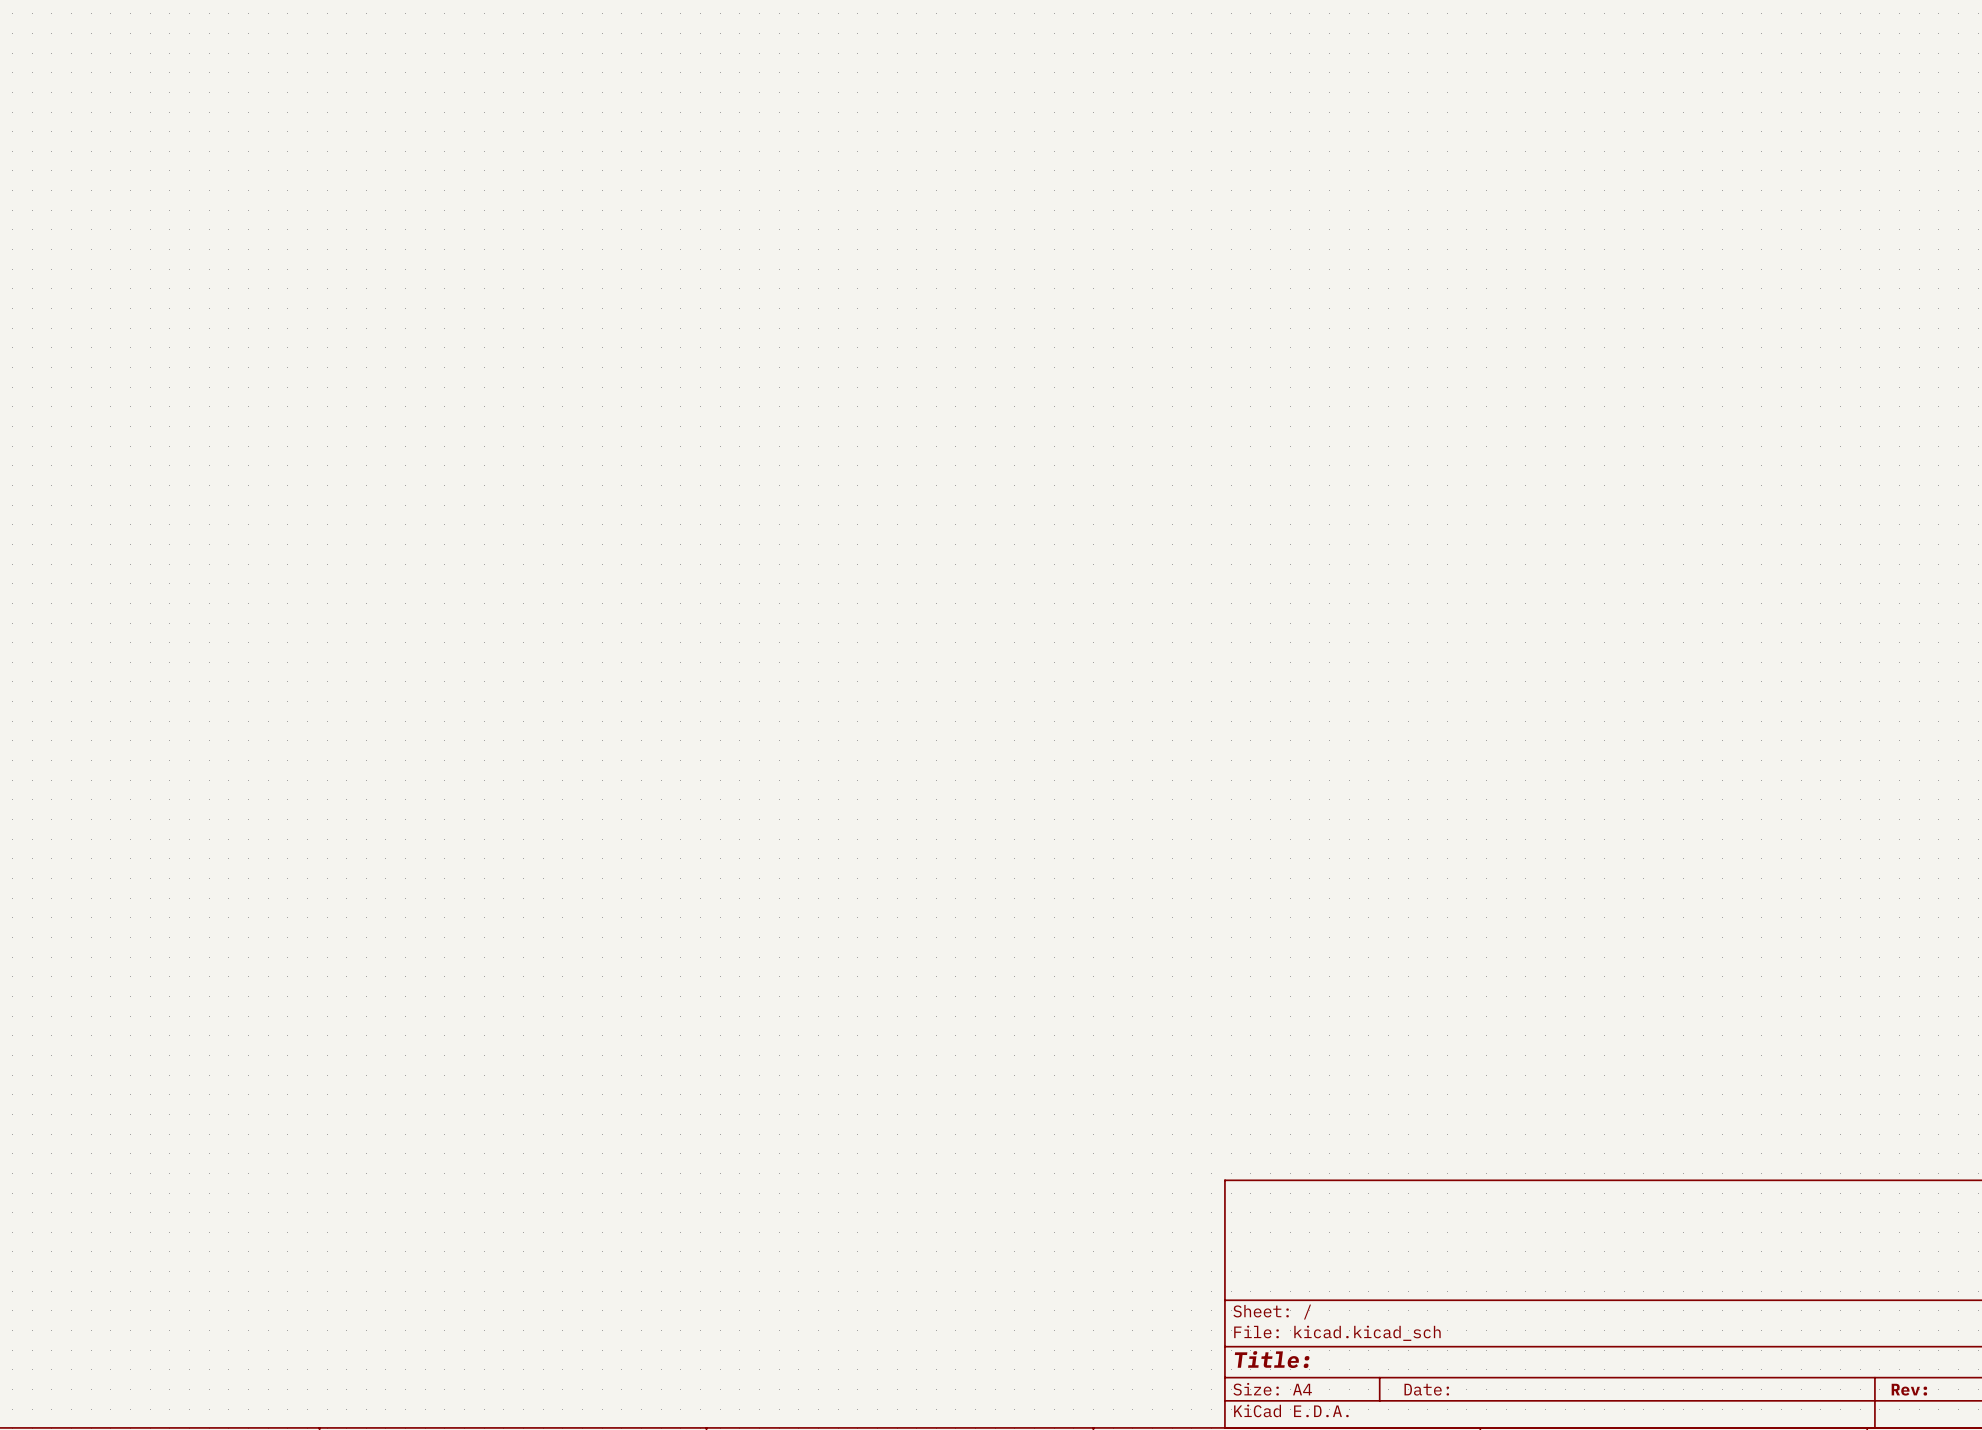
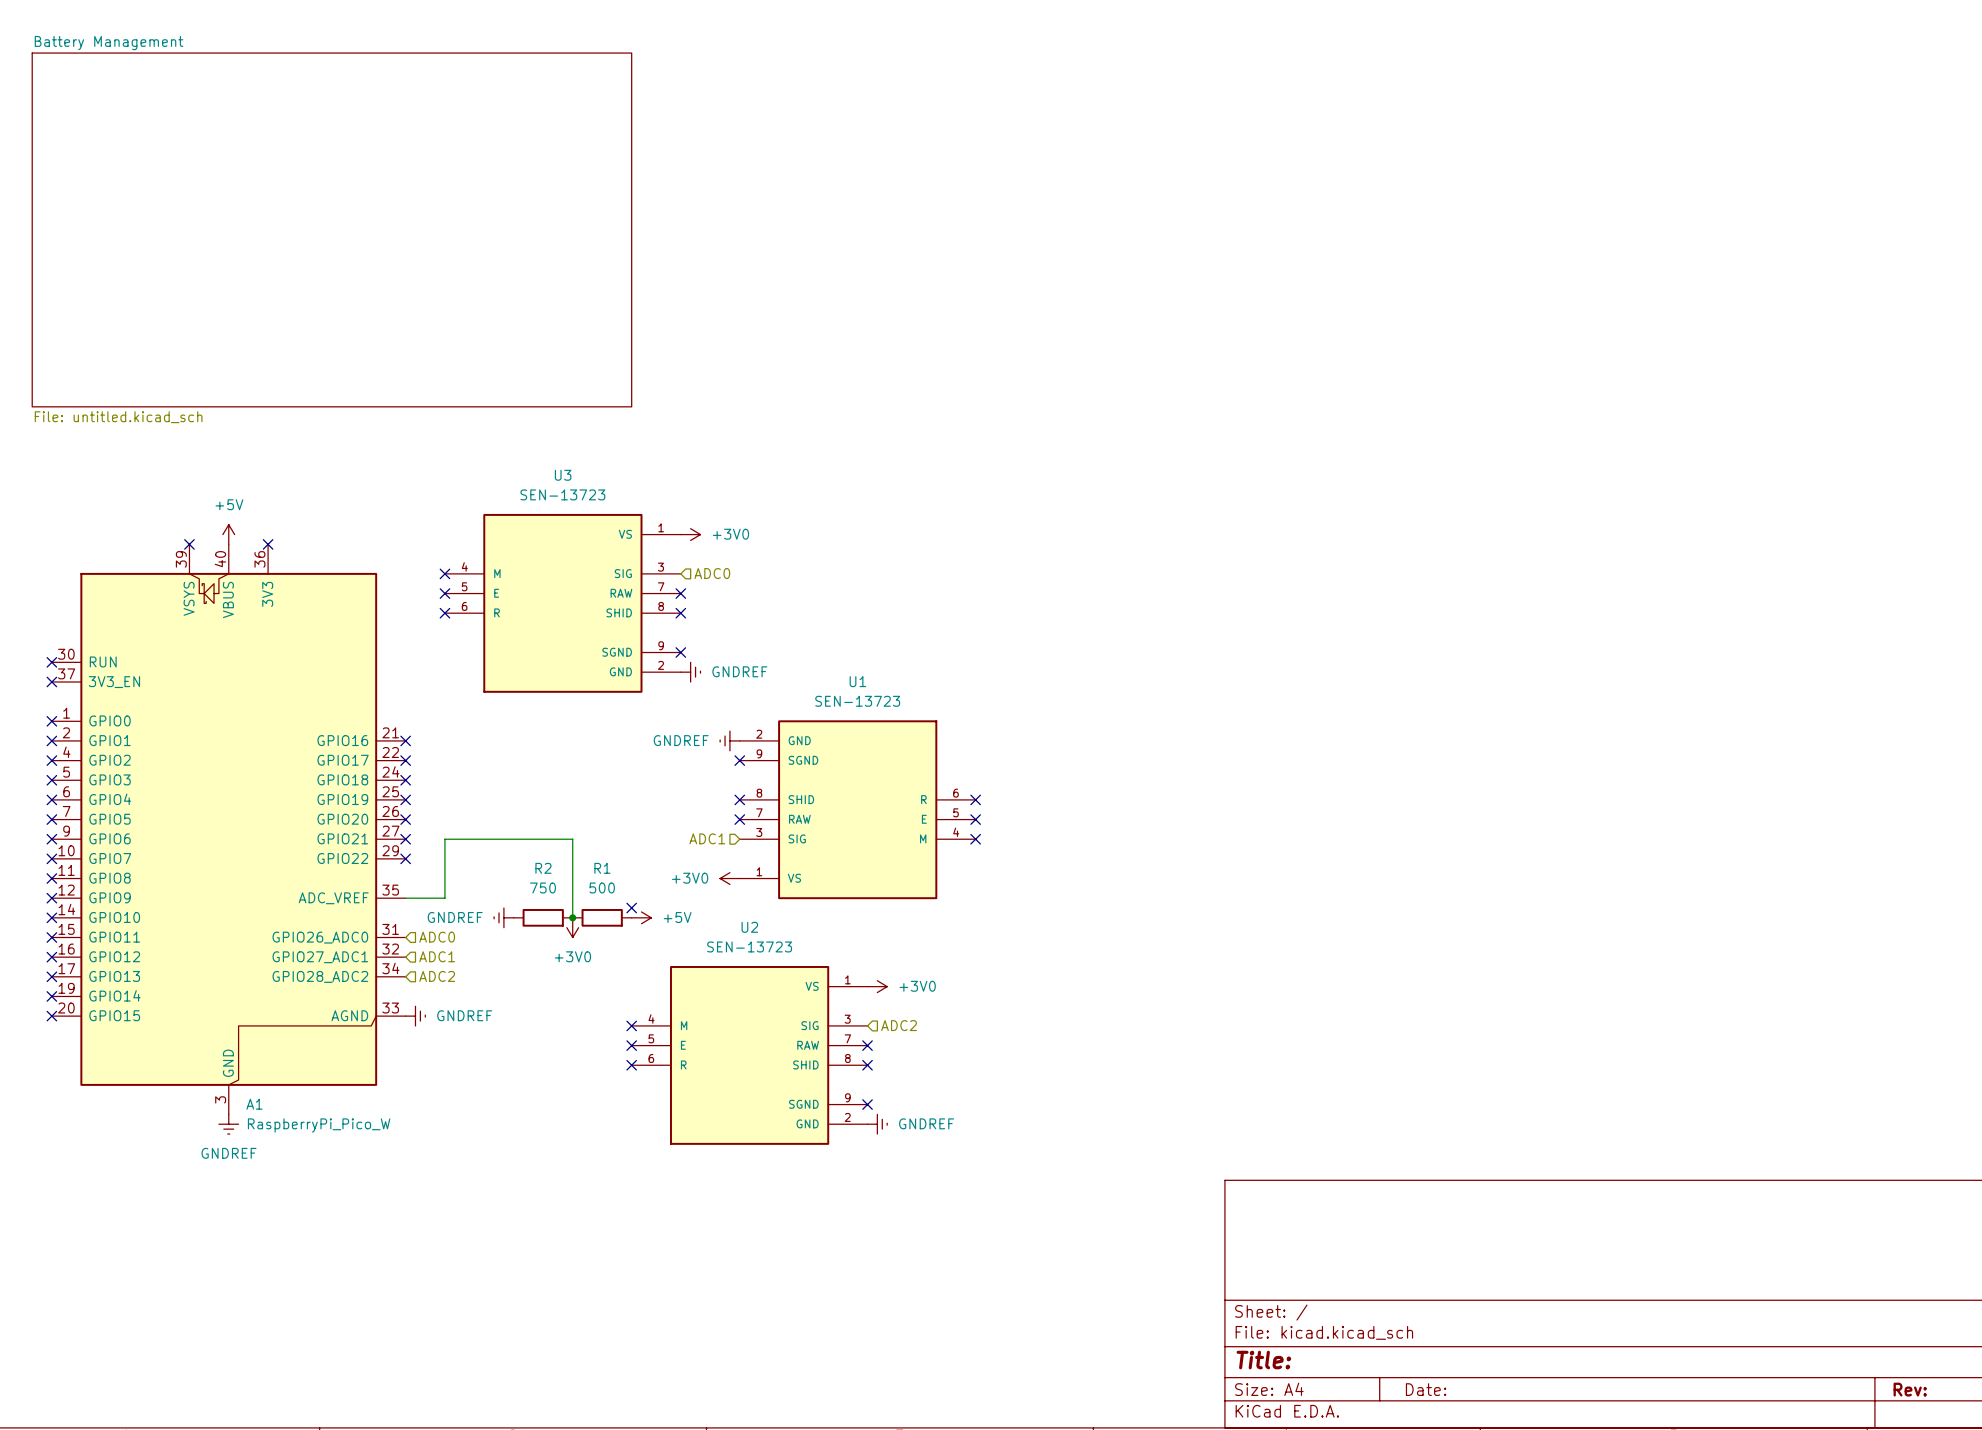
sheet Battery Management: none -> File: untitled.kicad_sch (331, 229)
power symbol: none -> +5V (228, 534)
power symbol: none -> +3V0 (690, 534)
no-connect mark: none -> (189, 544)
no-connect mark: none -> (268, 544)
no-connect mark: none -> (444, 573)
hierarchical label: none -> ADC0 (712, 573)
no-connect mark: none -> (444, 593)
no-connect mark: none -> (680, 593)
U3: none -> SEN-13723 (562, 603)
no-connect mark: none -> (444, 613)
no-connect mark: none -> (680, 613)
no-connect mark: none -> (680, 652)
no-connect mark: none -> (51, 662)
power symbol: none -> GNDREF (690, 672)
no-connect mark: none -> (51, 681)
no-connect mark: none -> (51, 721)
no-connect mark: none -> (51, 740)
no-connect mark: none -> (405, 740)
power symbol: none -> GNDREF (729, 740)
no-connect mark: none -> (51, 760)
no-connect mark: none -> (405, 760)
no-connect mark: none -> (739, 760)
no-connect mark: none -> (51, 780)
no-connect mark: none -> (405, 780)
no-connect mark: none -> (51, 799)
no-connect mark: none -> (405, 799)
no-connect mark: none -> (739, 799)
no-connect mark: none -> (975, 799)
U1: none -> SEN-13723 (857, 809)
no-connect mark: none -> (51, 819)
no-connect mark: none -> (405, 819)
no-connect mark: none -> (739, 819)
no-connect mark: none -> (975, 819)
A1: none -> RaspberryPi_Pico_W (228, 829)
hierarchical label: none -> ADC1 (707, 838)
no-connect mark: none -> (51, 839)
no-connect mark: none -> (405, 839)
no-connect mark: none -> (975, 839)
no-connect mark: none -> (51, 858)
no-connect mark: none -> (405, 858)
no-connect mark: none -> (51, 878)
power symbol: none -> +3V0 (729, 878)
no-connect mark: none -> (51, 898)
wire: none -> (405, 898) (444, 898) (444, 839) (572, 839) (572, 917)
no-connect mark: none -> (631, 908)
no-connect mark: none -> (51, 917)
power symbol: none -> GNDREF (503, 917)
R2: none -> 750 (543, 917)
junction: none -> (572, 917)
R1: none -> 500 (602, 917)
power symbol: none -> +5V (641, 917)
power symbol: none -> +3V0 (572, 927)
no-connect mark: none -> (51, 937)
hierarchical label: none -> ADC0 (437, 937)
hierarchical label: none -> ADC1 (437, 956)
no-connect mark: none -> (51, 957)
no-connect mark: none -> (51, 976)
hierarchical label: none -> ADC2 (437, 976)
power symbol: none -> +3V0 (877, 986)
no-connect mark: none -> (51, 996)
no-connect mark: none -> (51, 1016)
power symbol: none -> GNDREF (415, 1016)
no-connect mark: none -> (631, 1025)
hierarchical label: none -> ADC2 (899, 1025)
no-connect mark: none -> (631, 1045)
no-connect mark: none -> (867, 1045)
U2: none -> SEN-13723 (749, 1055)
no-connect mark: none -> (631, 1065)
no-connect mark: none -> (867, 1065)
no-connect mark: none -> (867, 1104)
power symbol: none -> GNDREF (228, 1124)
power symbol: none -> GNDREF (877, 1124)

